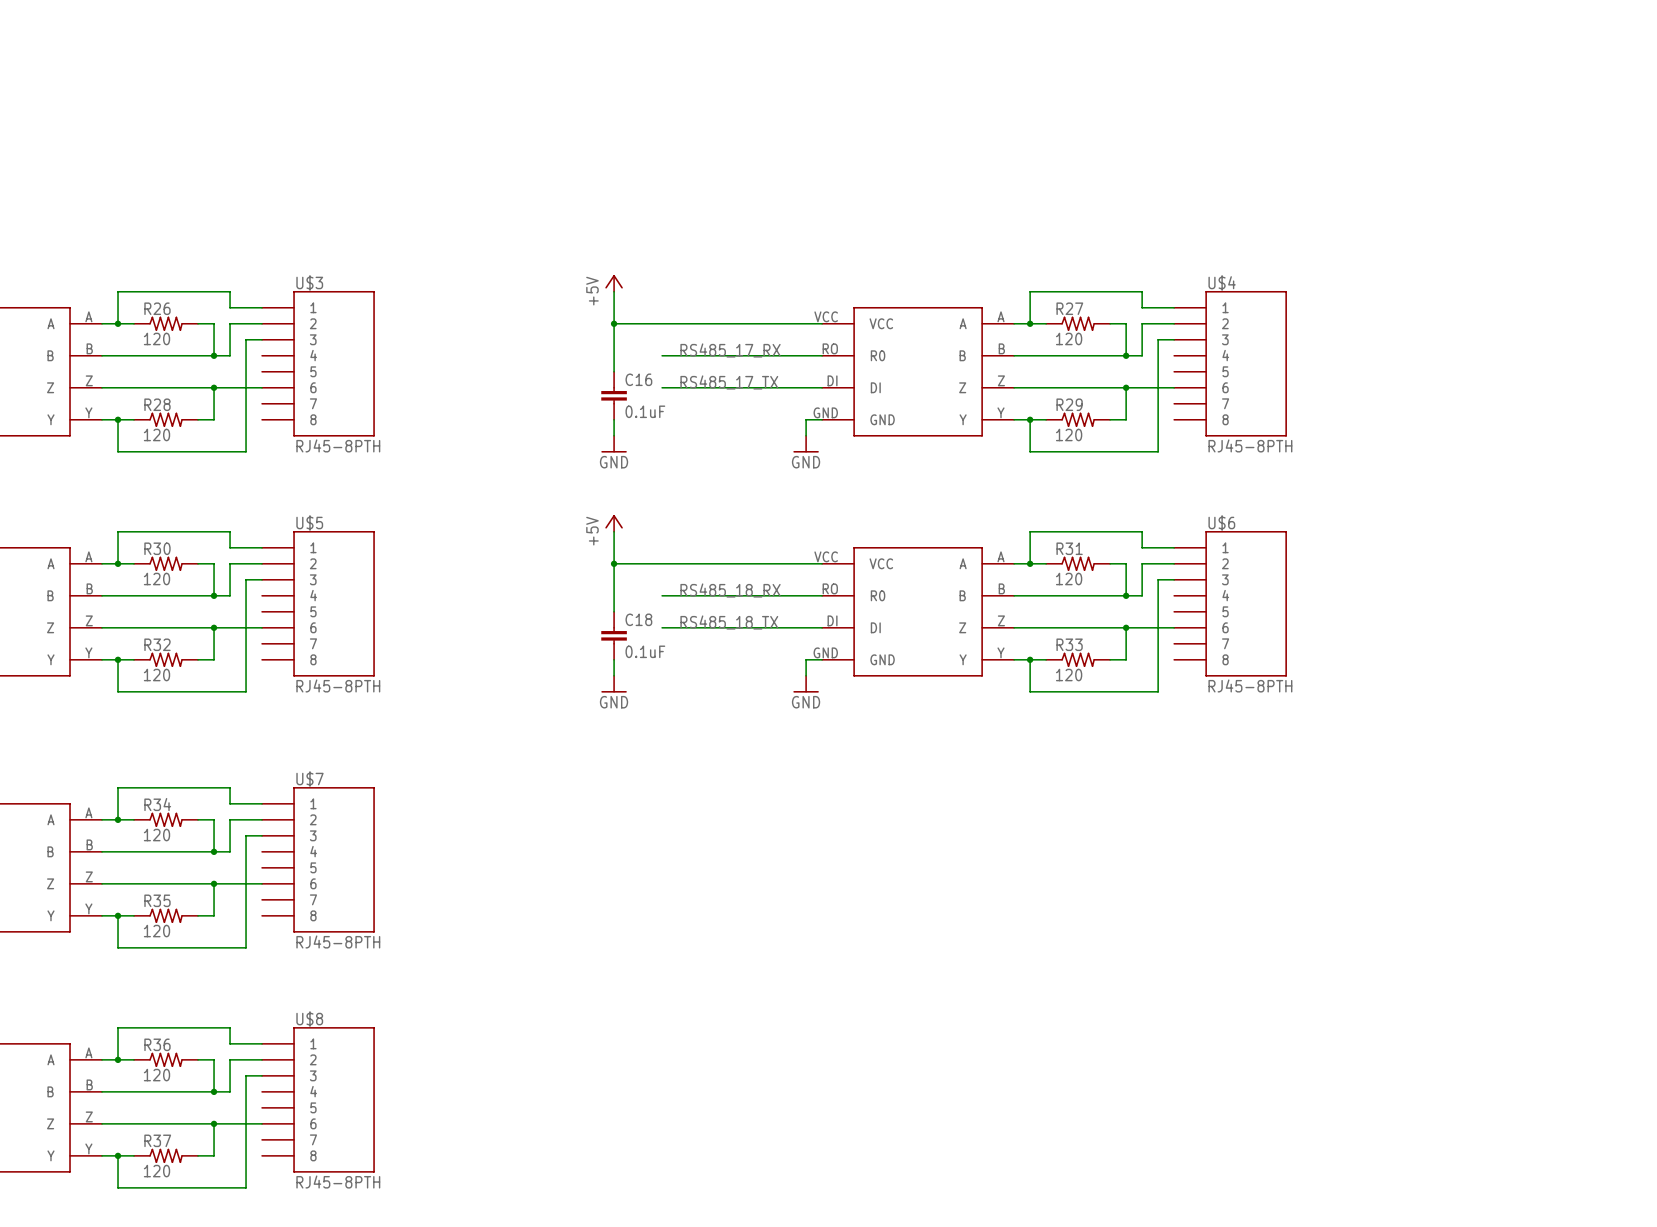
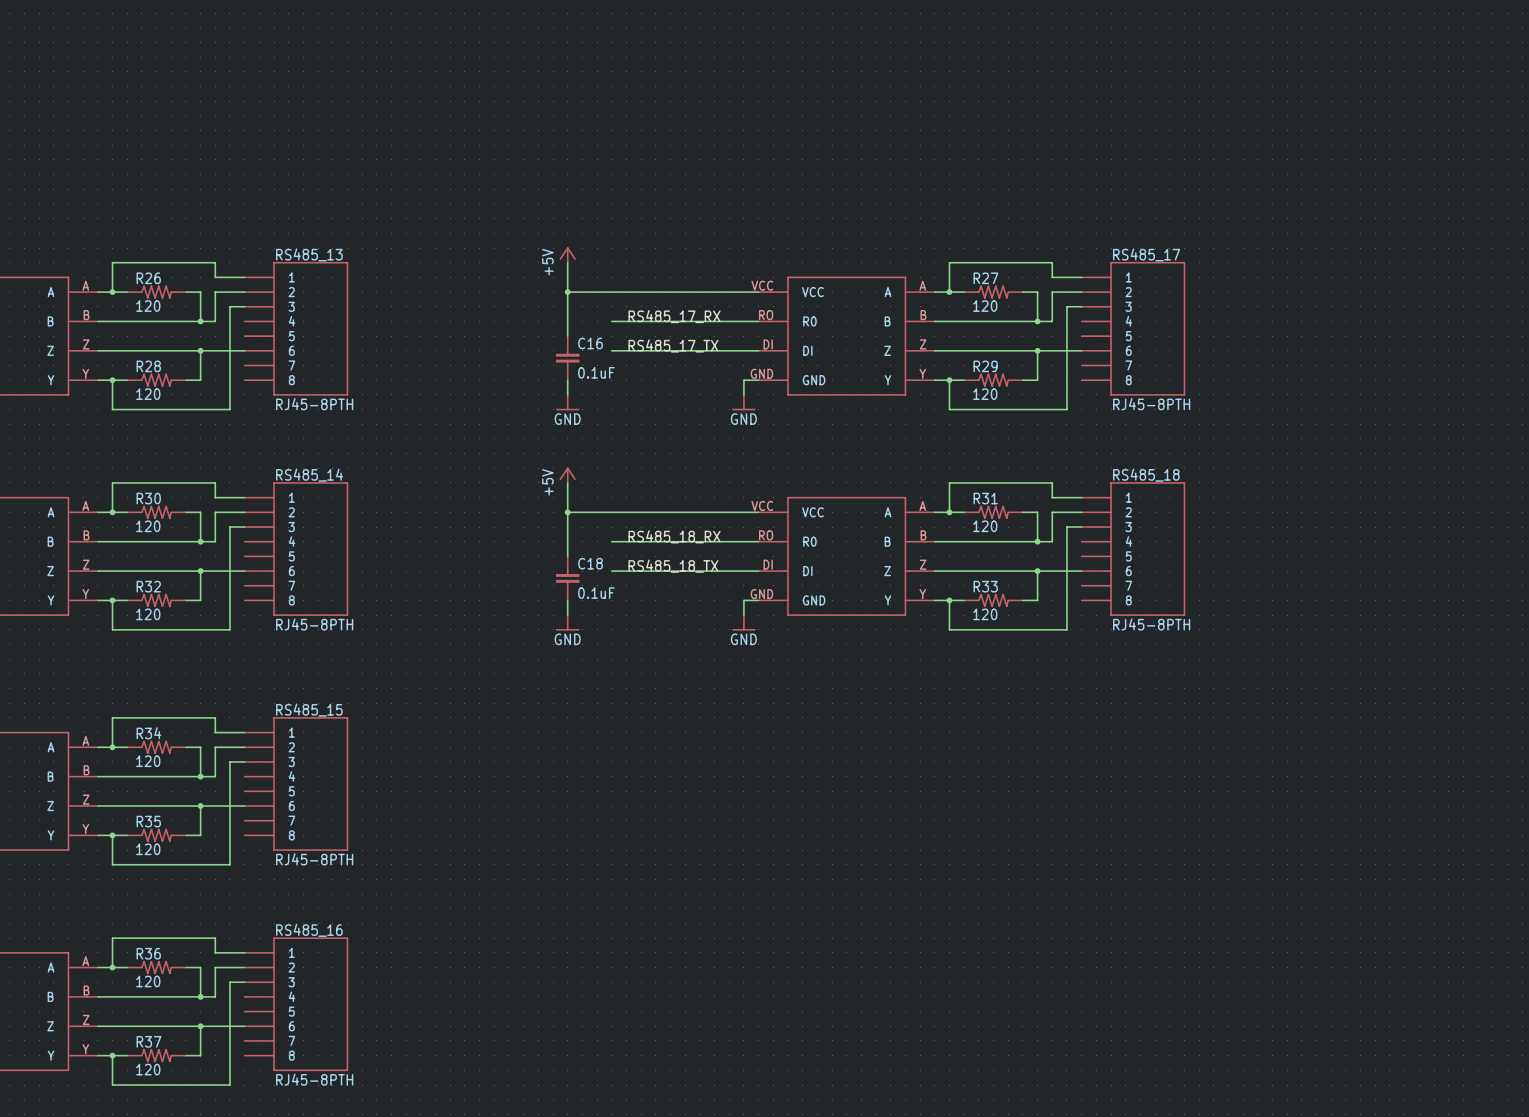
U$3 name: U$3 (309, 282) -> RS485_13 (309, 254)
U$4 name: U$4 (1222, 282) -> RS485_17 (1146, 254)
U$5 name: U$5 (309, 523) -> RS485_14 (309, 475)
U$6 name: U$6 (1221, 523) -> RS485_18 (1146, 475)
U$7 name: U$7 (309, 779) -> RS485_15 (309, 710)
U$8 name: U$8 (309, 1019) -> RS485_16 (309, 930)

